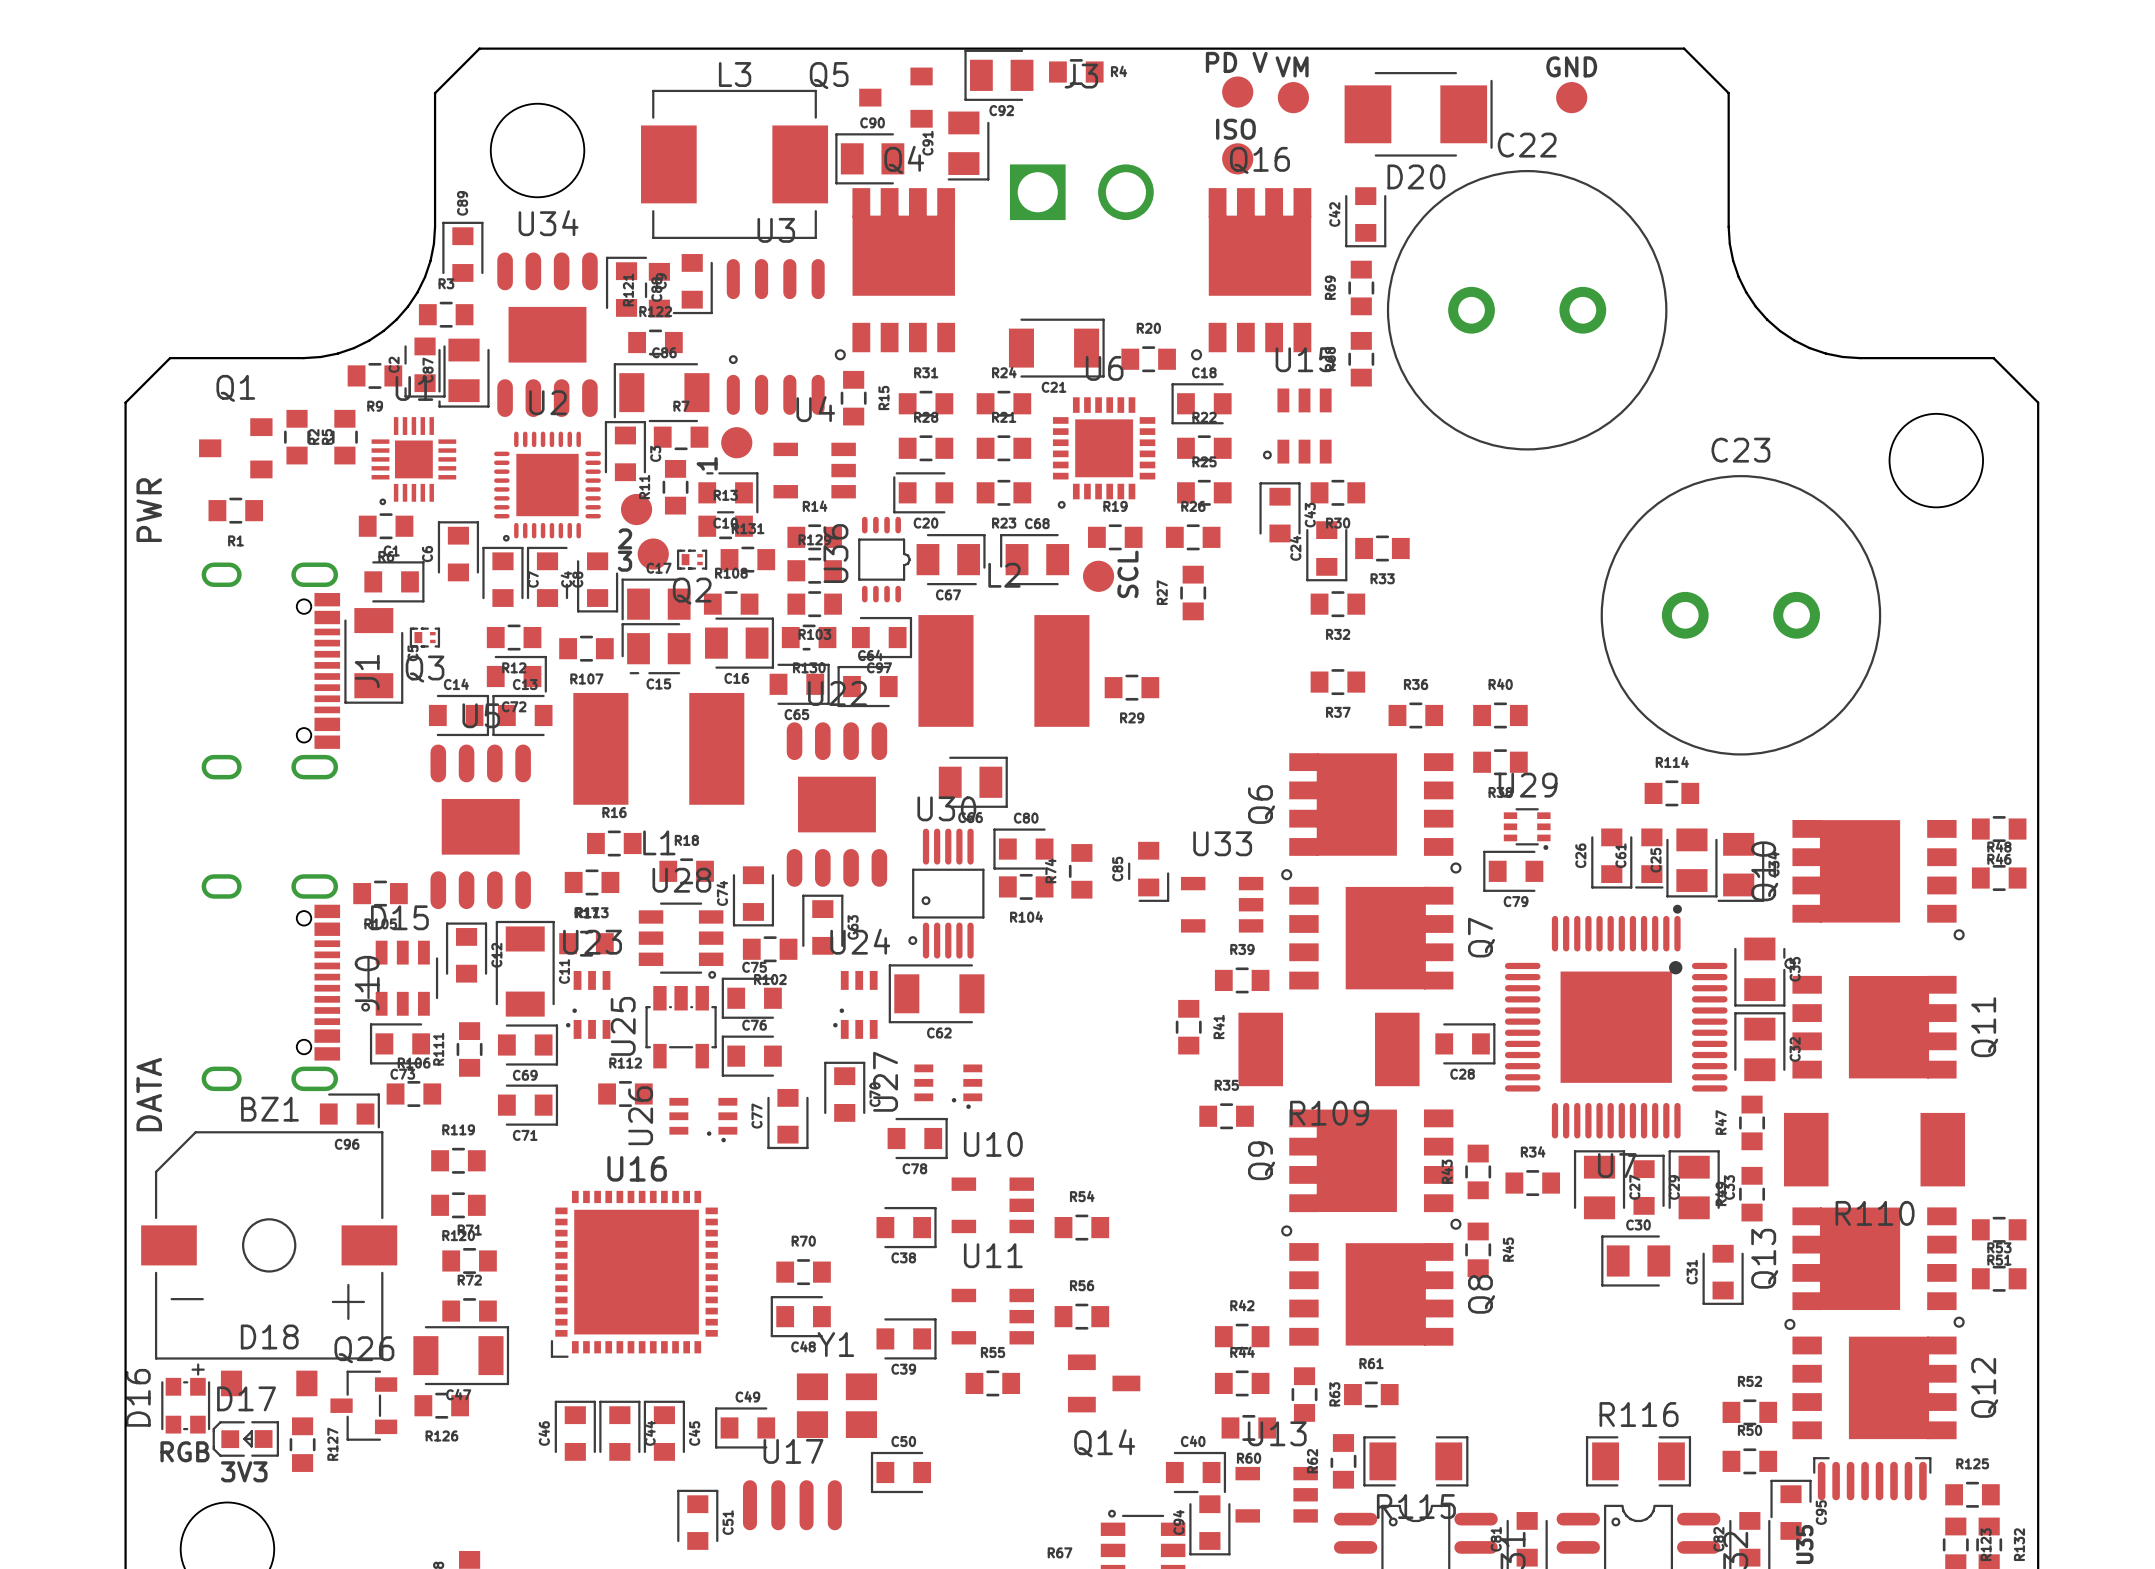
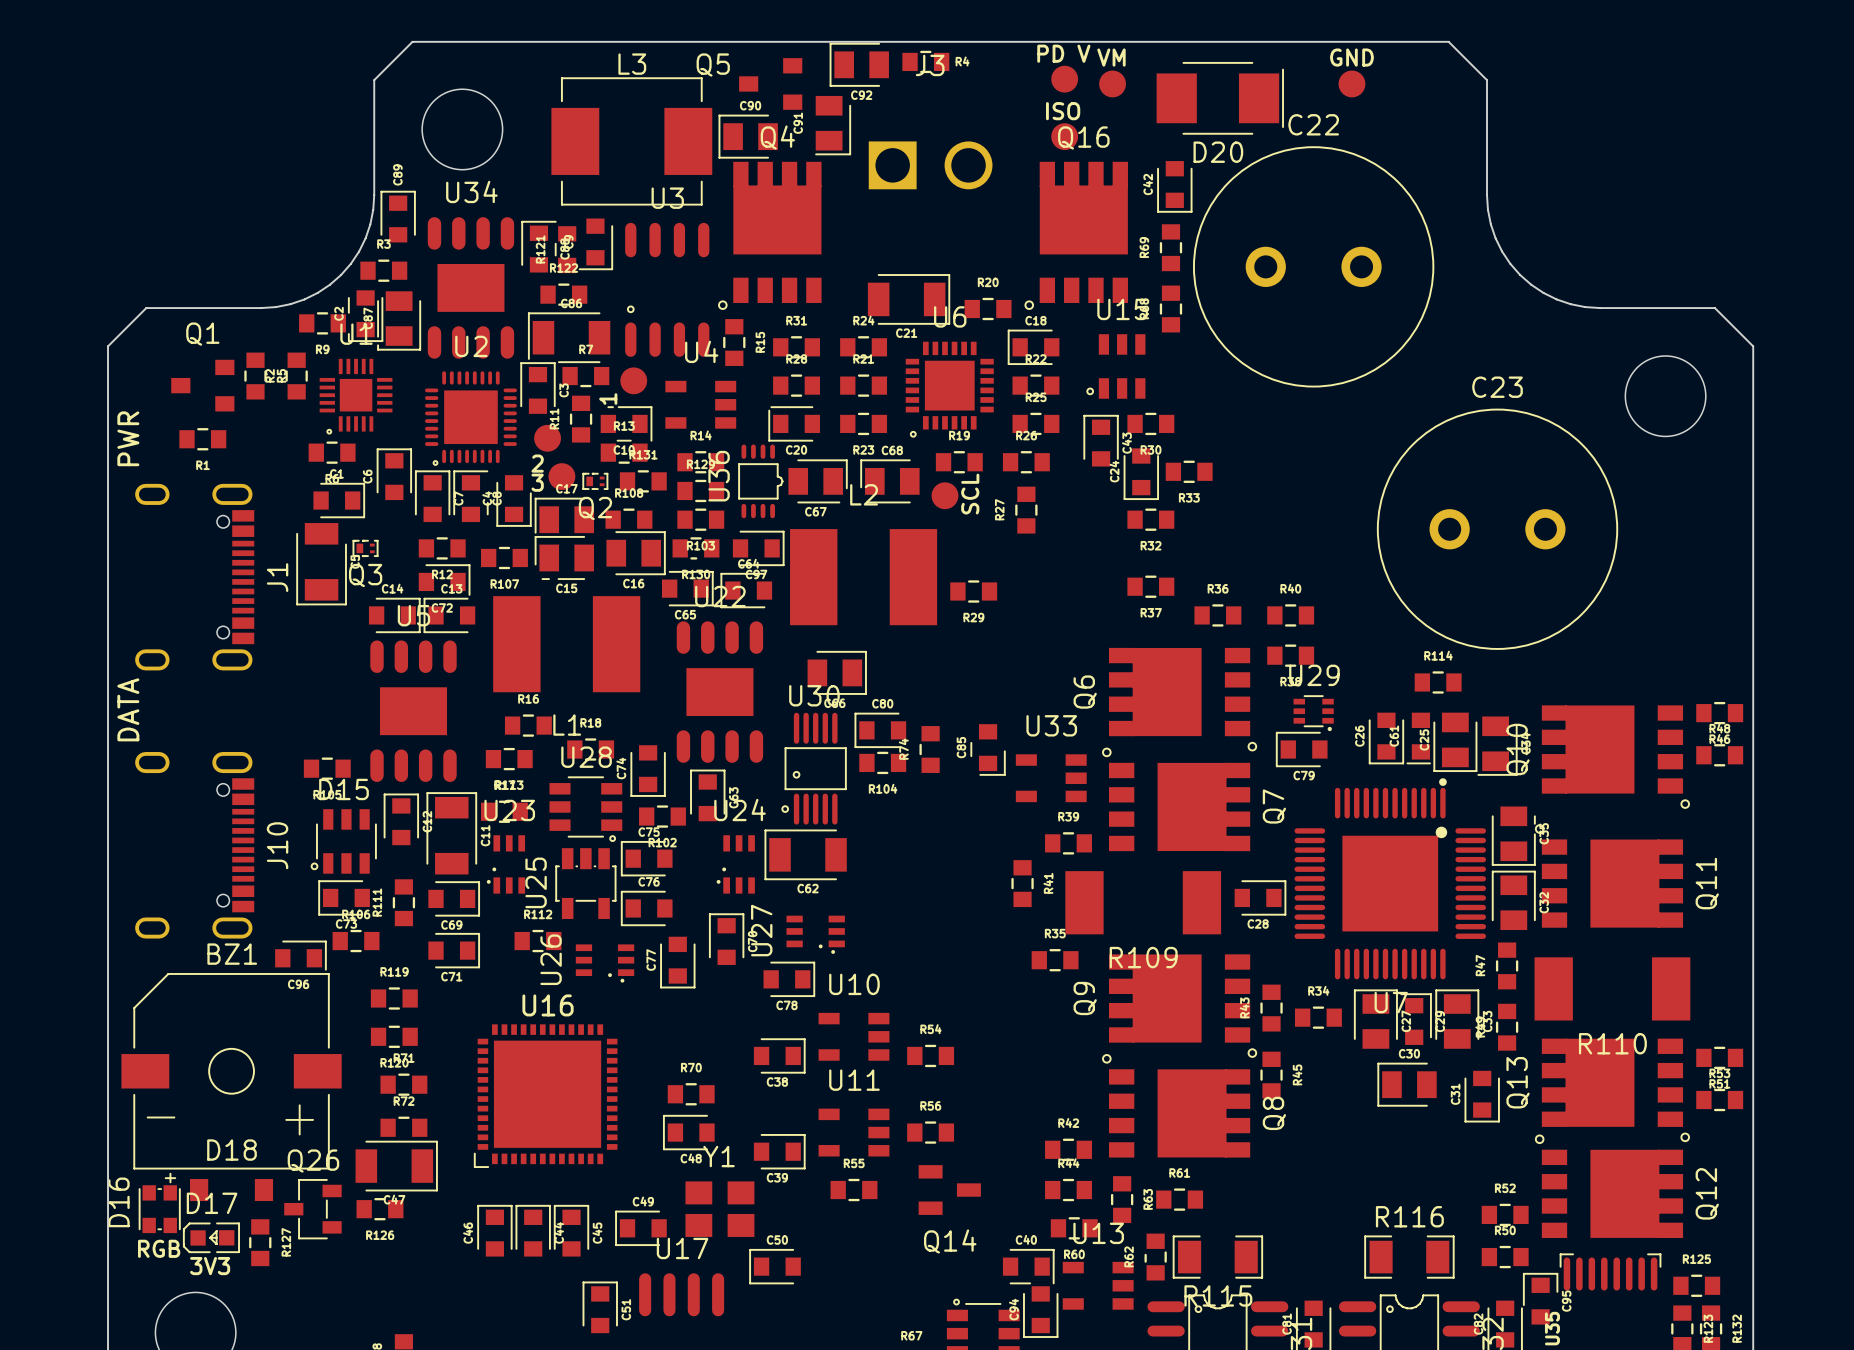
J1 position: (270, 670) -> (194, 577)
J10 position: (270, 982) -> (194, 845)
text position: DATA (149, 1094) -> DATA (128, 709)

